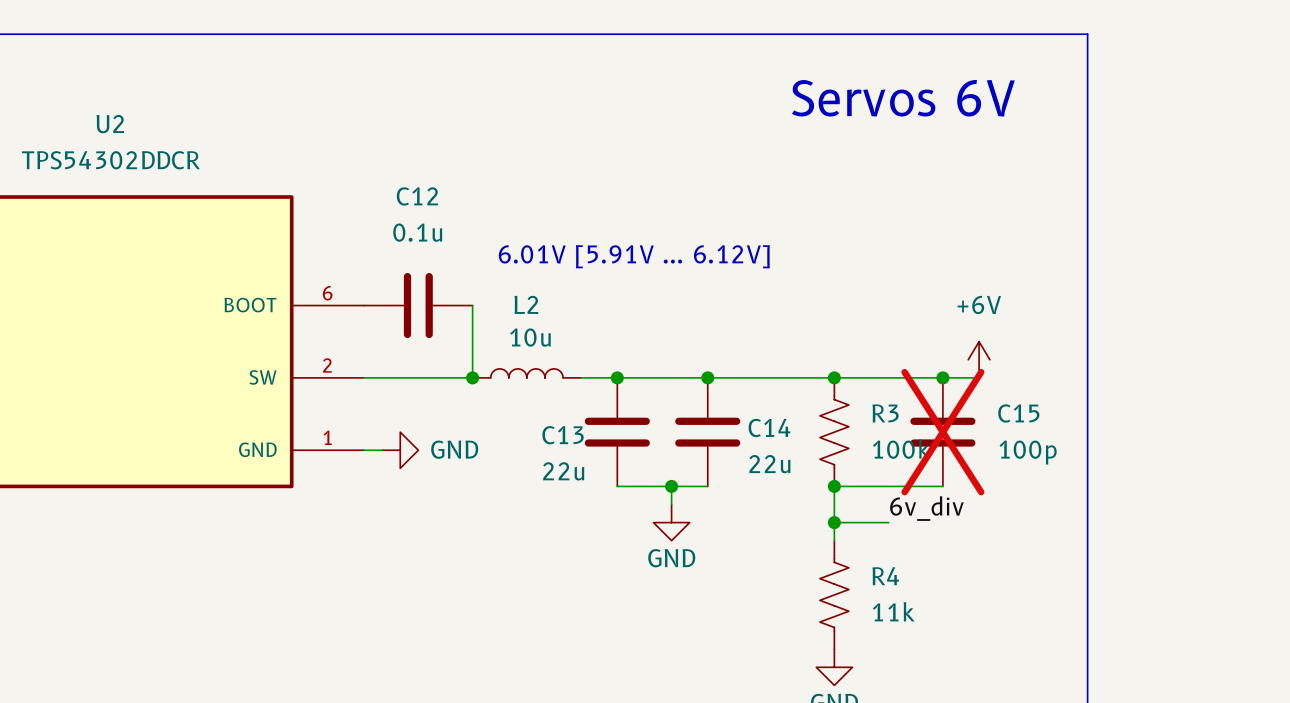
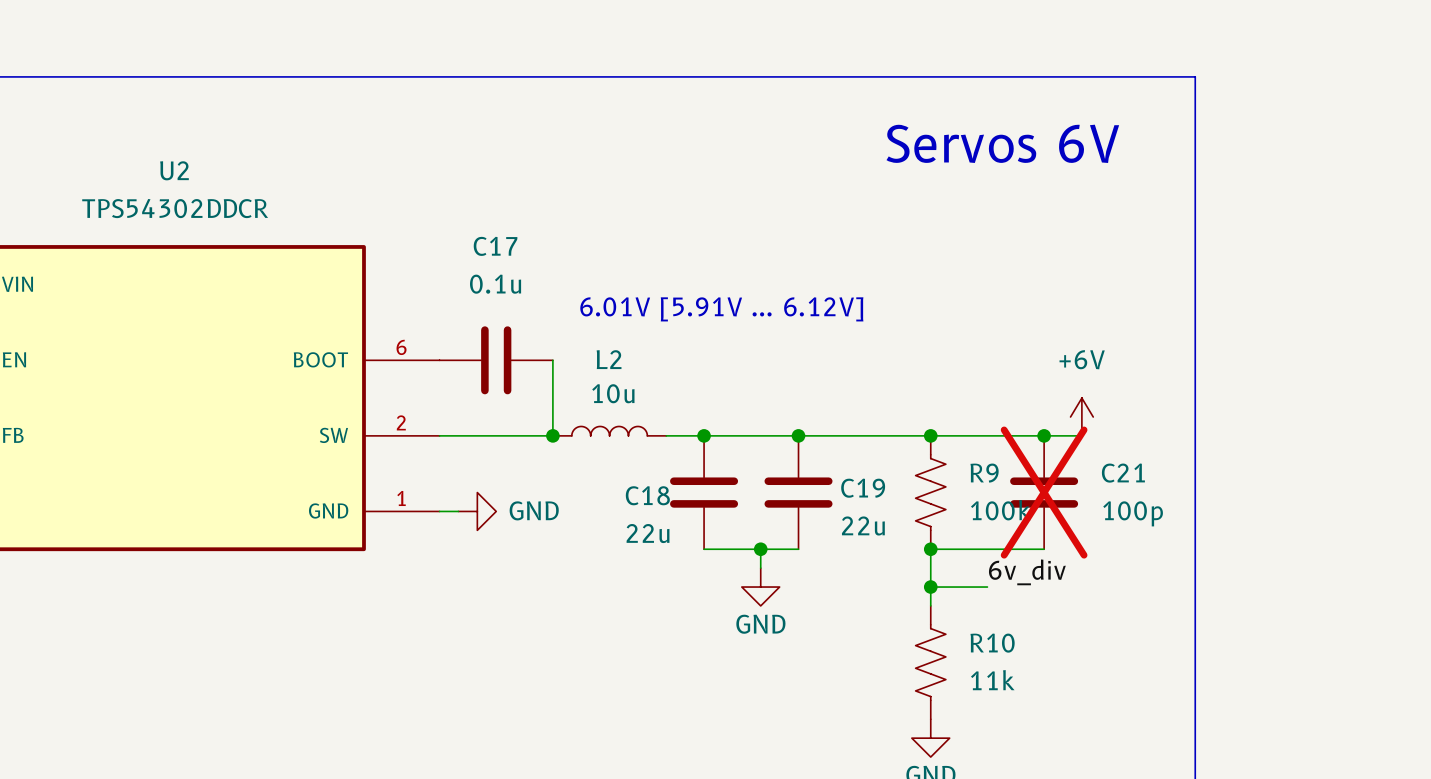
C12 name: C12 (417, 196) -> C17 (495, 246)
R3 name: R3 (885, 413) -> R9 (984, 473)
C15 name: C15 (1018, 413) -> C21 (1123, 473)
C14 name: C14 (769, 427) -> C19 (863, 488)
C13 name: C13 (563, 435) -> C18 (647, 495)
R4 name: R4 (885, 576) -> R10 (992, 643)

